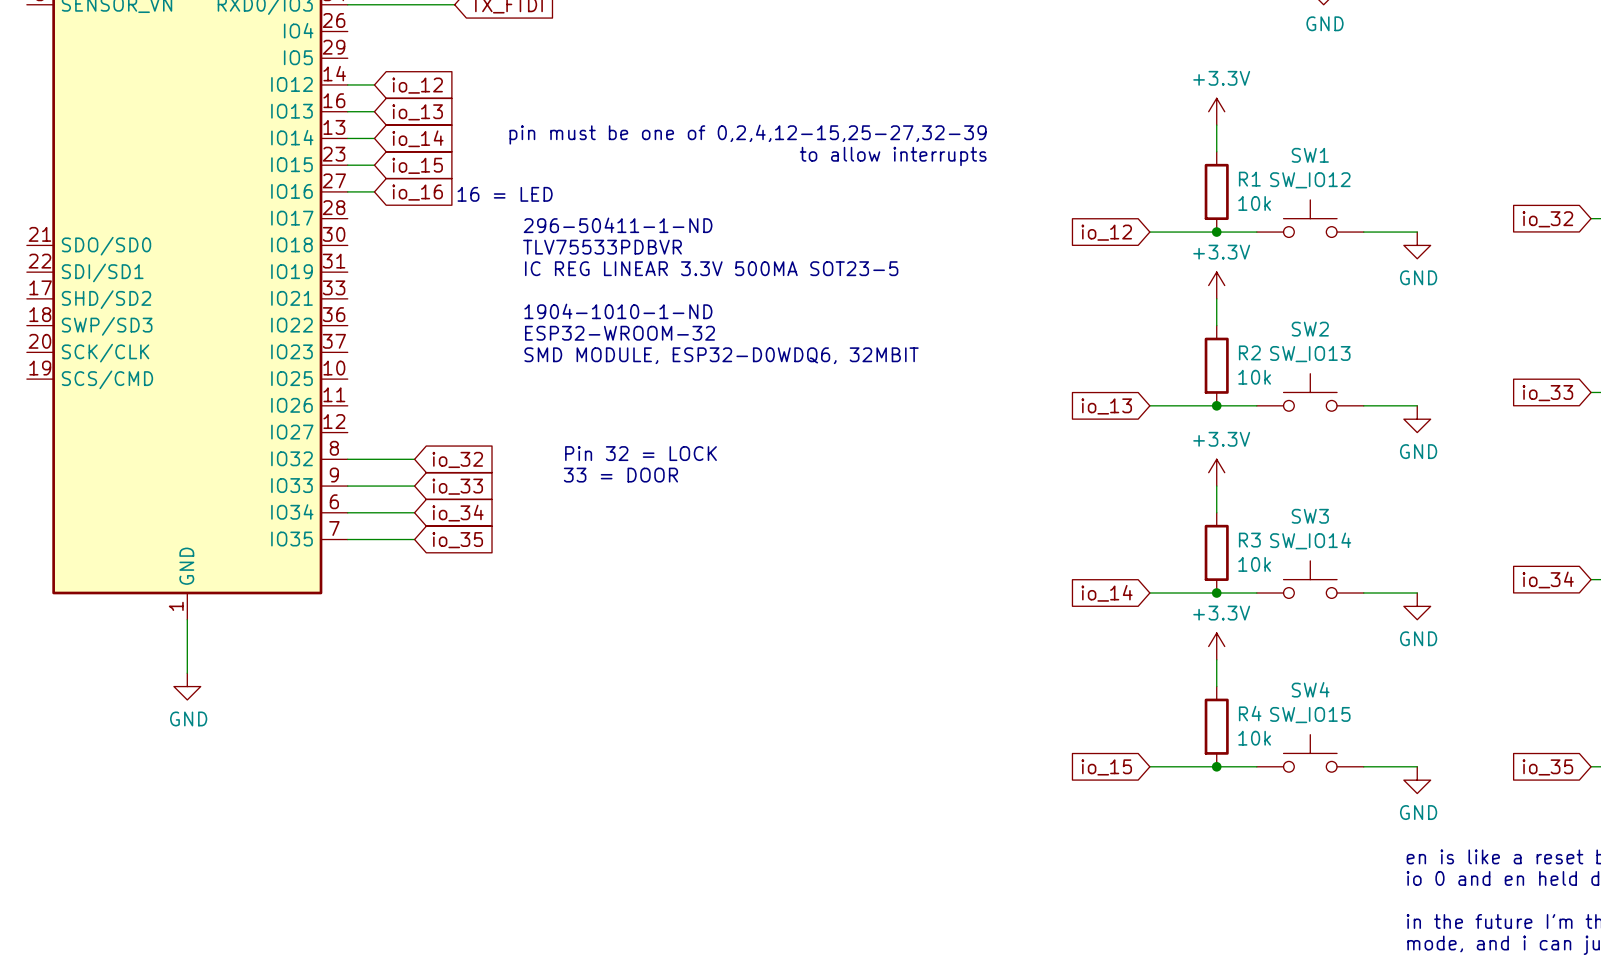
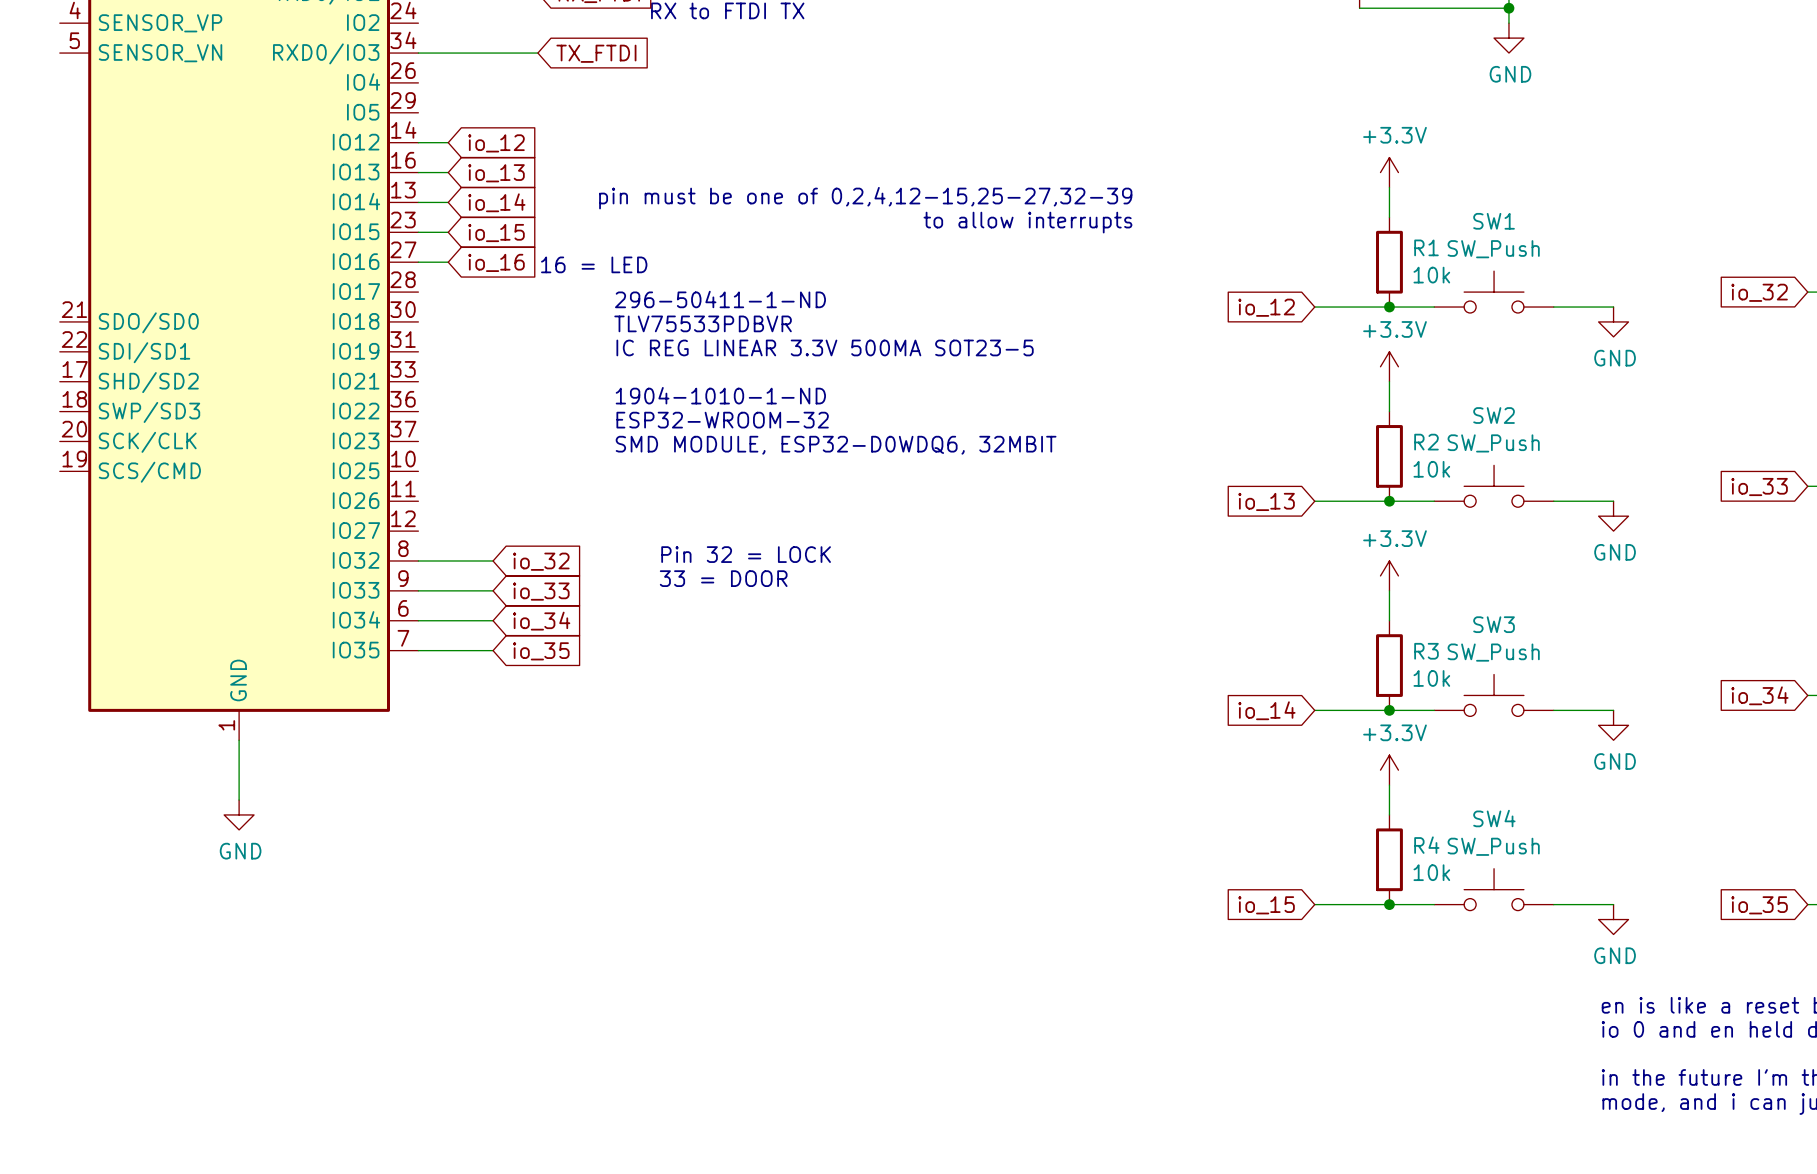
SW1 value: SW_IO12 (1310, 180) -> SW_Push (1493, 249)
SW2 value: SW_IO13 (1310, 354) -> SW_Push (1493, 443)
SW3 value: SW_IO14 (1310, 540) -> SW_Push (1493, 652)
SW4 value: SW_IO15 (1310, 715) -> SW_Push (1493, 846)

